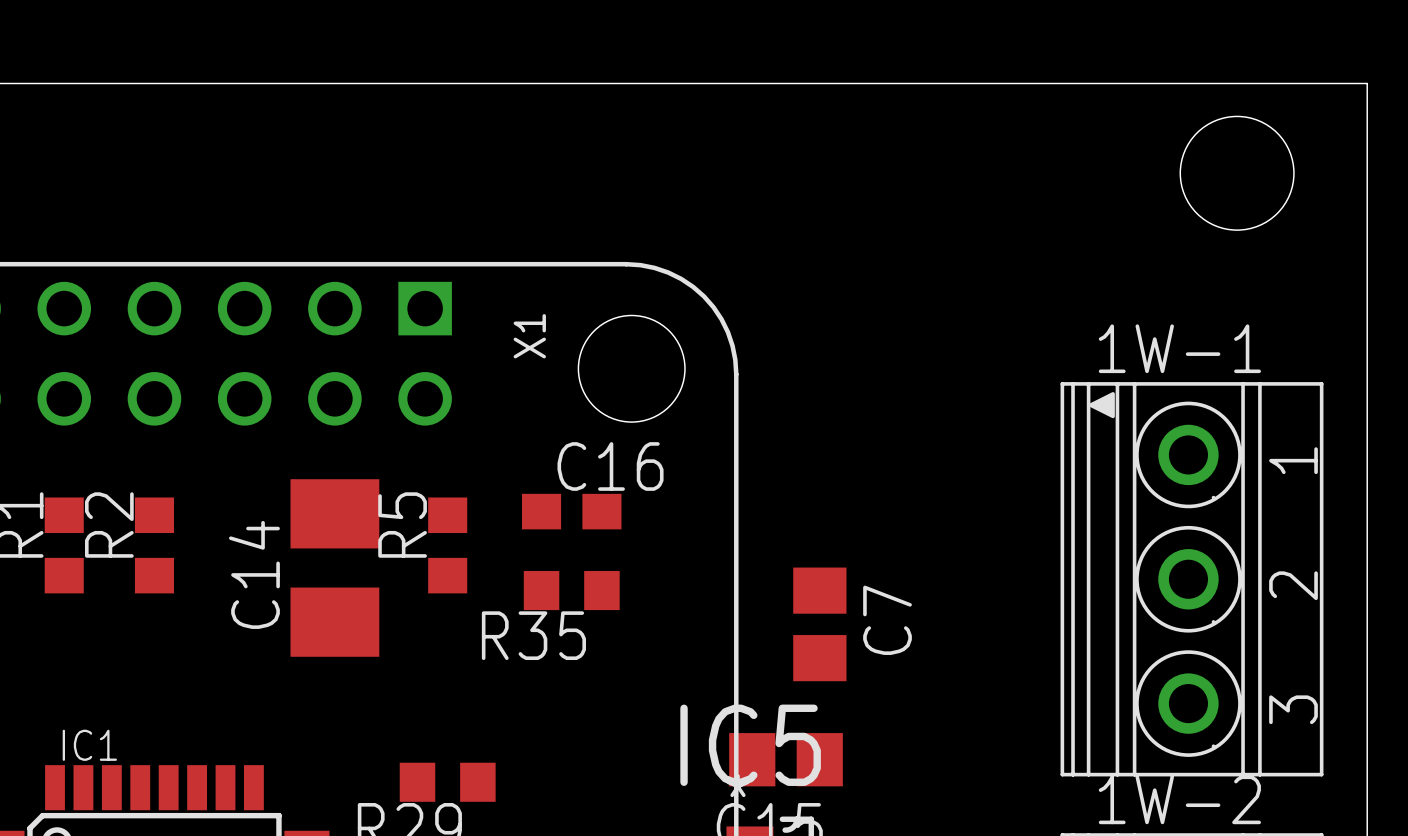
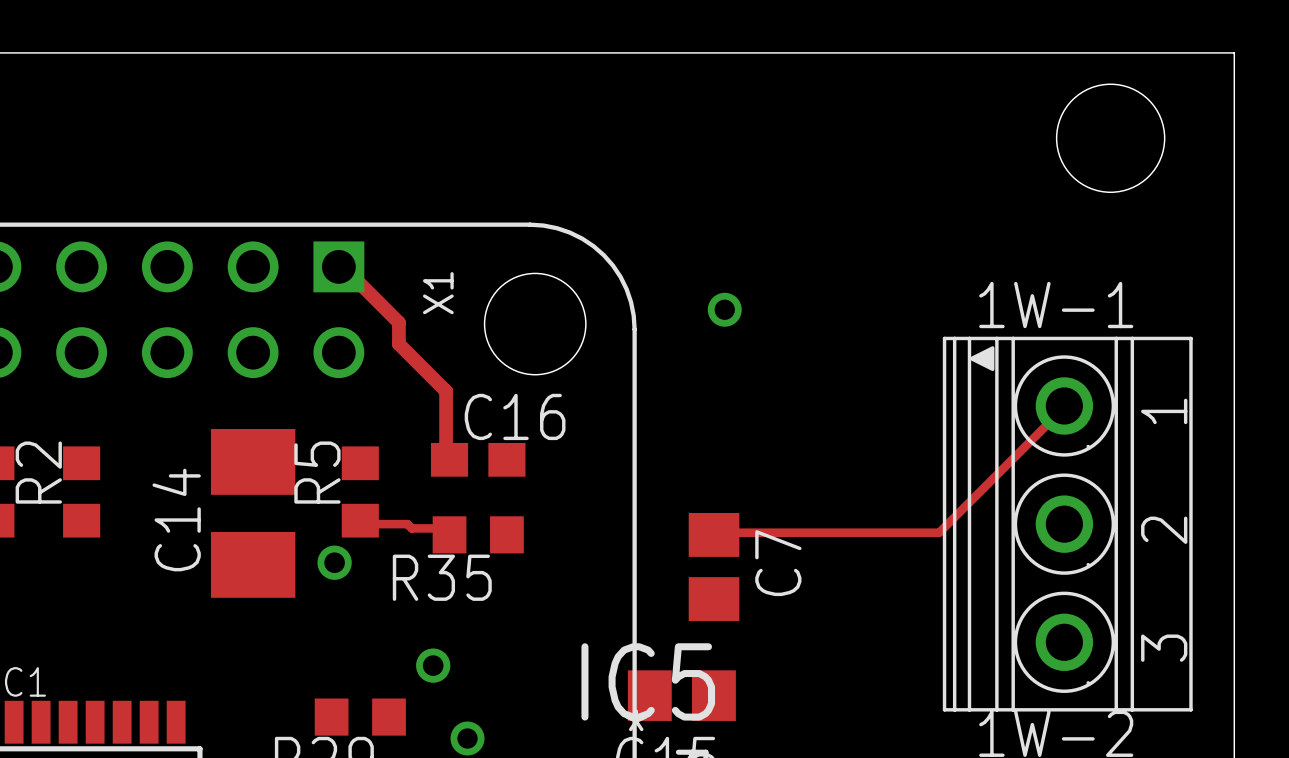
track: none -> (338, 266) (343, 266) (398, 322) (398, 344) (446, 391) (446, 459) (449, 459)
via: none -> (724, 309)
track: none -> (1064, 405) (939, 532) (716, 532) (714, 534)
track: none -> (360, 524) (407, 524) (411, 528) (441, 528) (449, 534)
via: none -> (334, 562)
via: none -> (433, 665)
via: none -> (467, 738)

